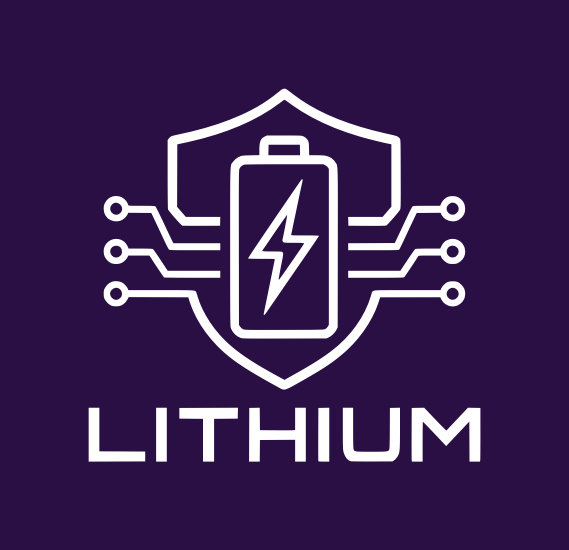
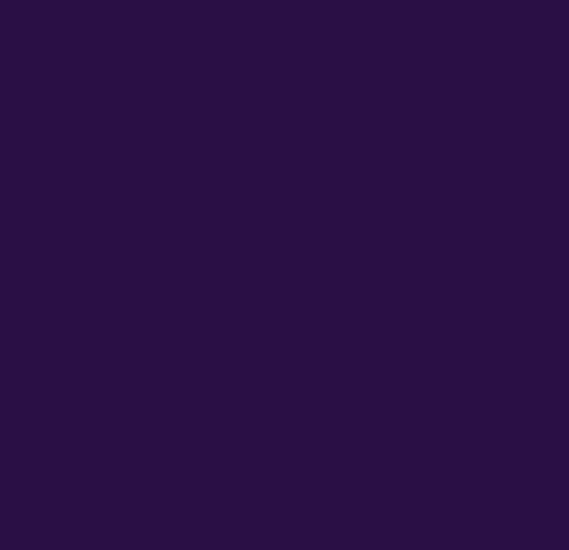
drawing: [88, 88, 481, 462] -> none

